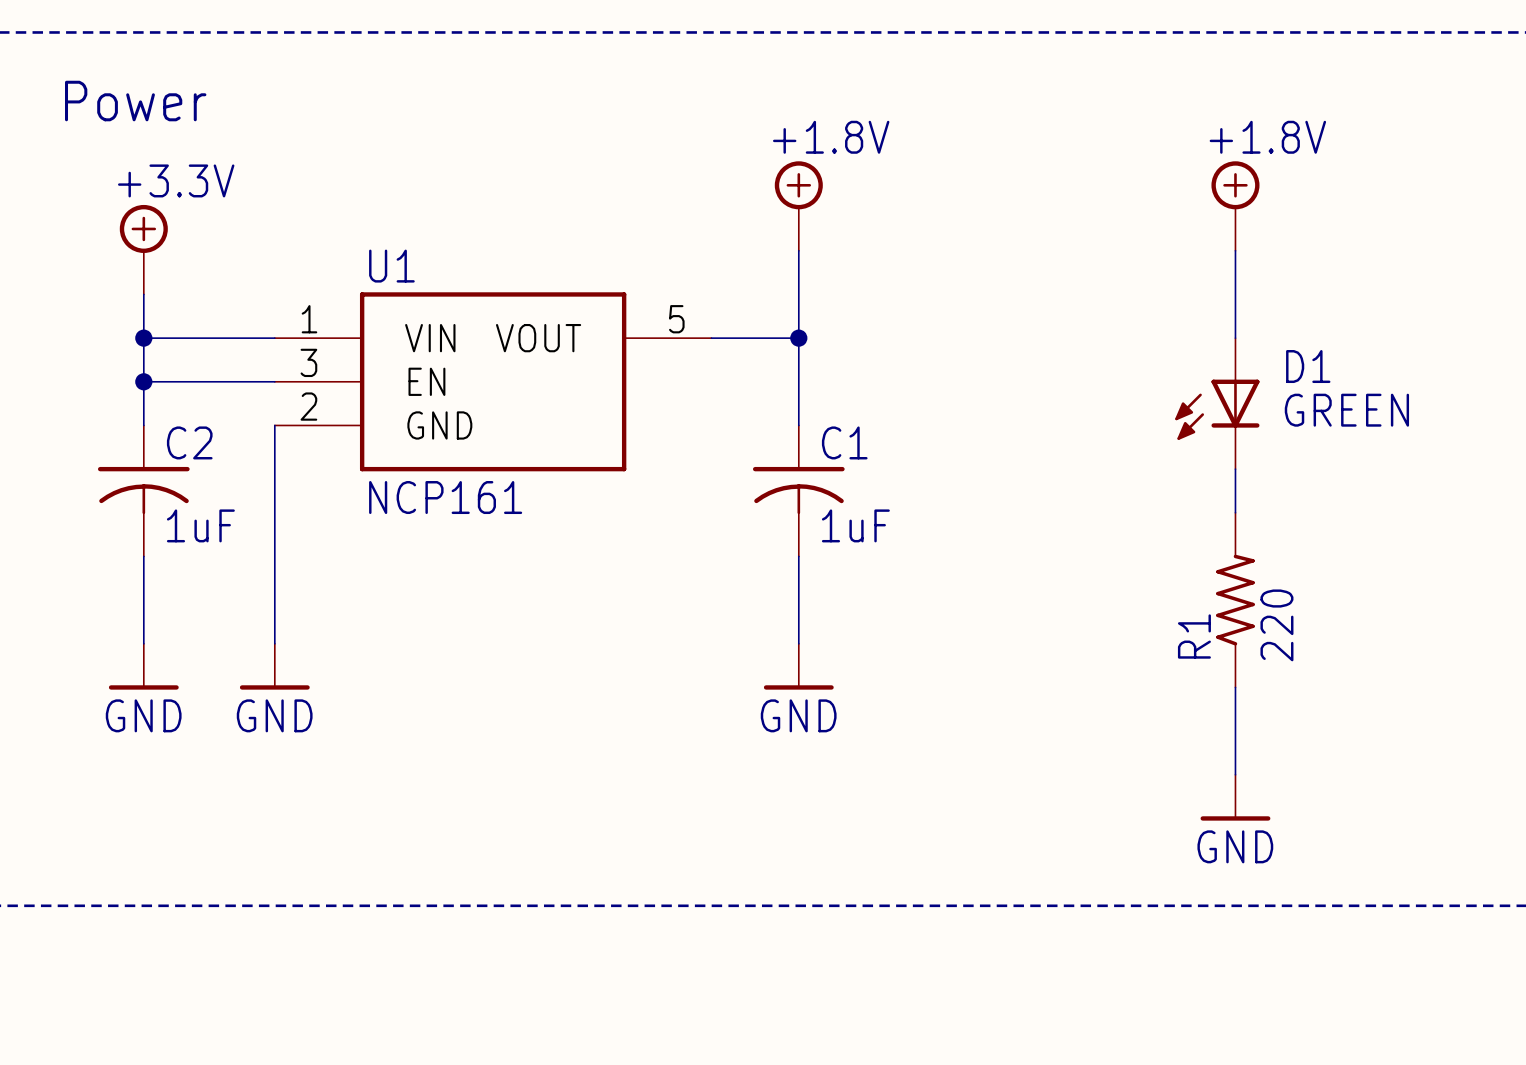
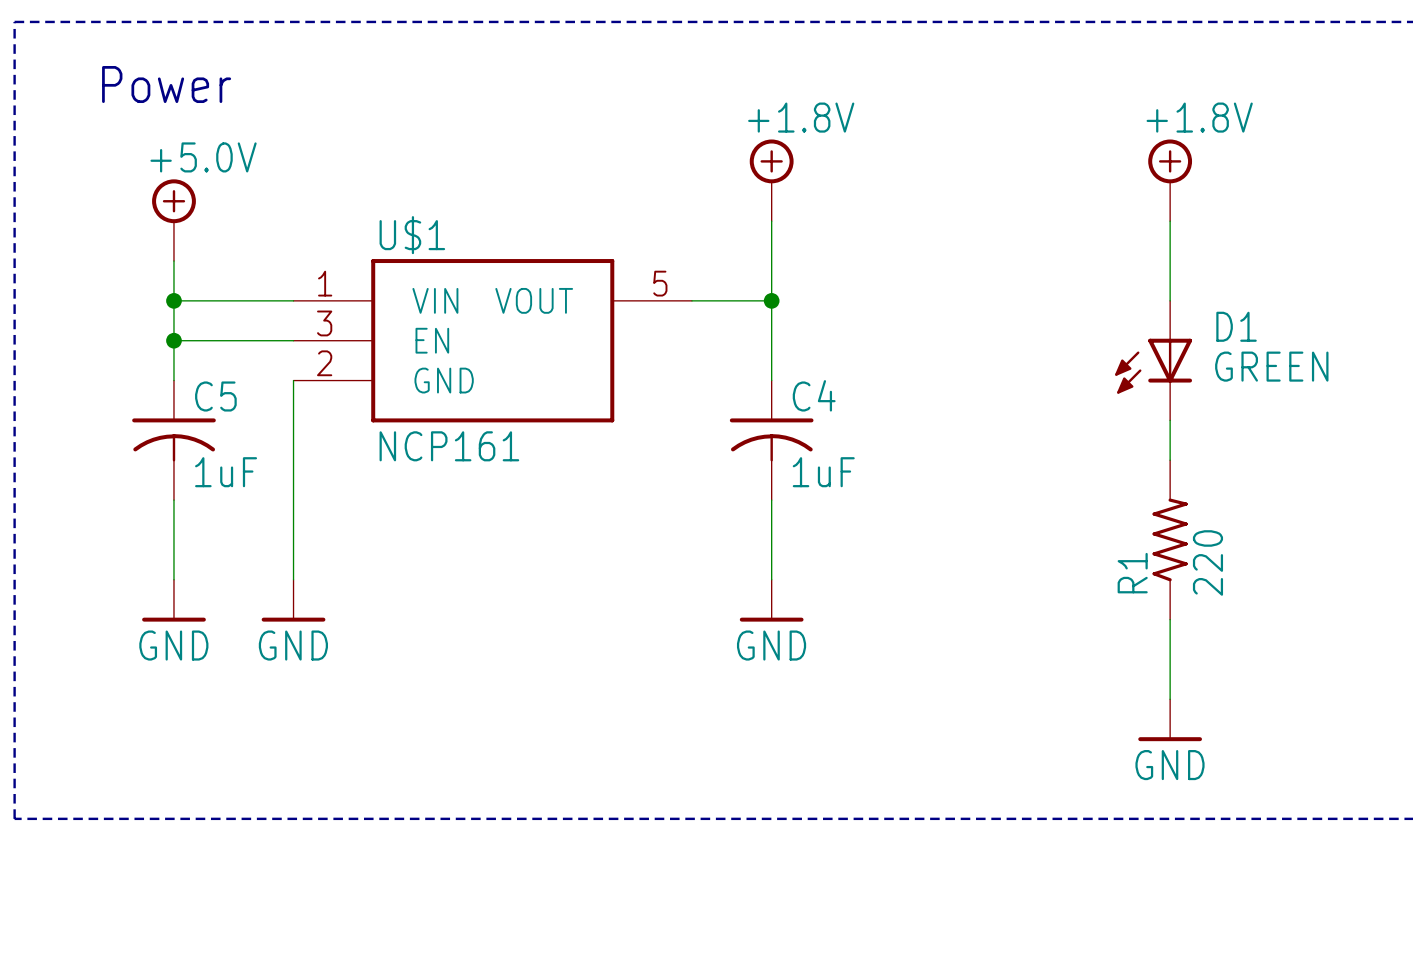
power symbol: +3.3V (143, 249) -> +5.0V (173, 220)
U1 name: U1 (391, 266) -> U$1 (412, 235)
C2 name: C2 (189, 442) -> C5 (215, 396)
C1 name: C1 (844, 442) -> C4 (814, 395)

